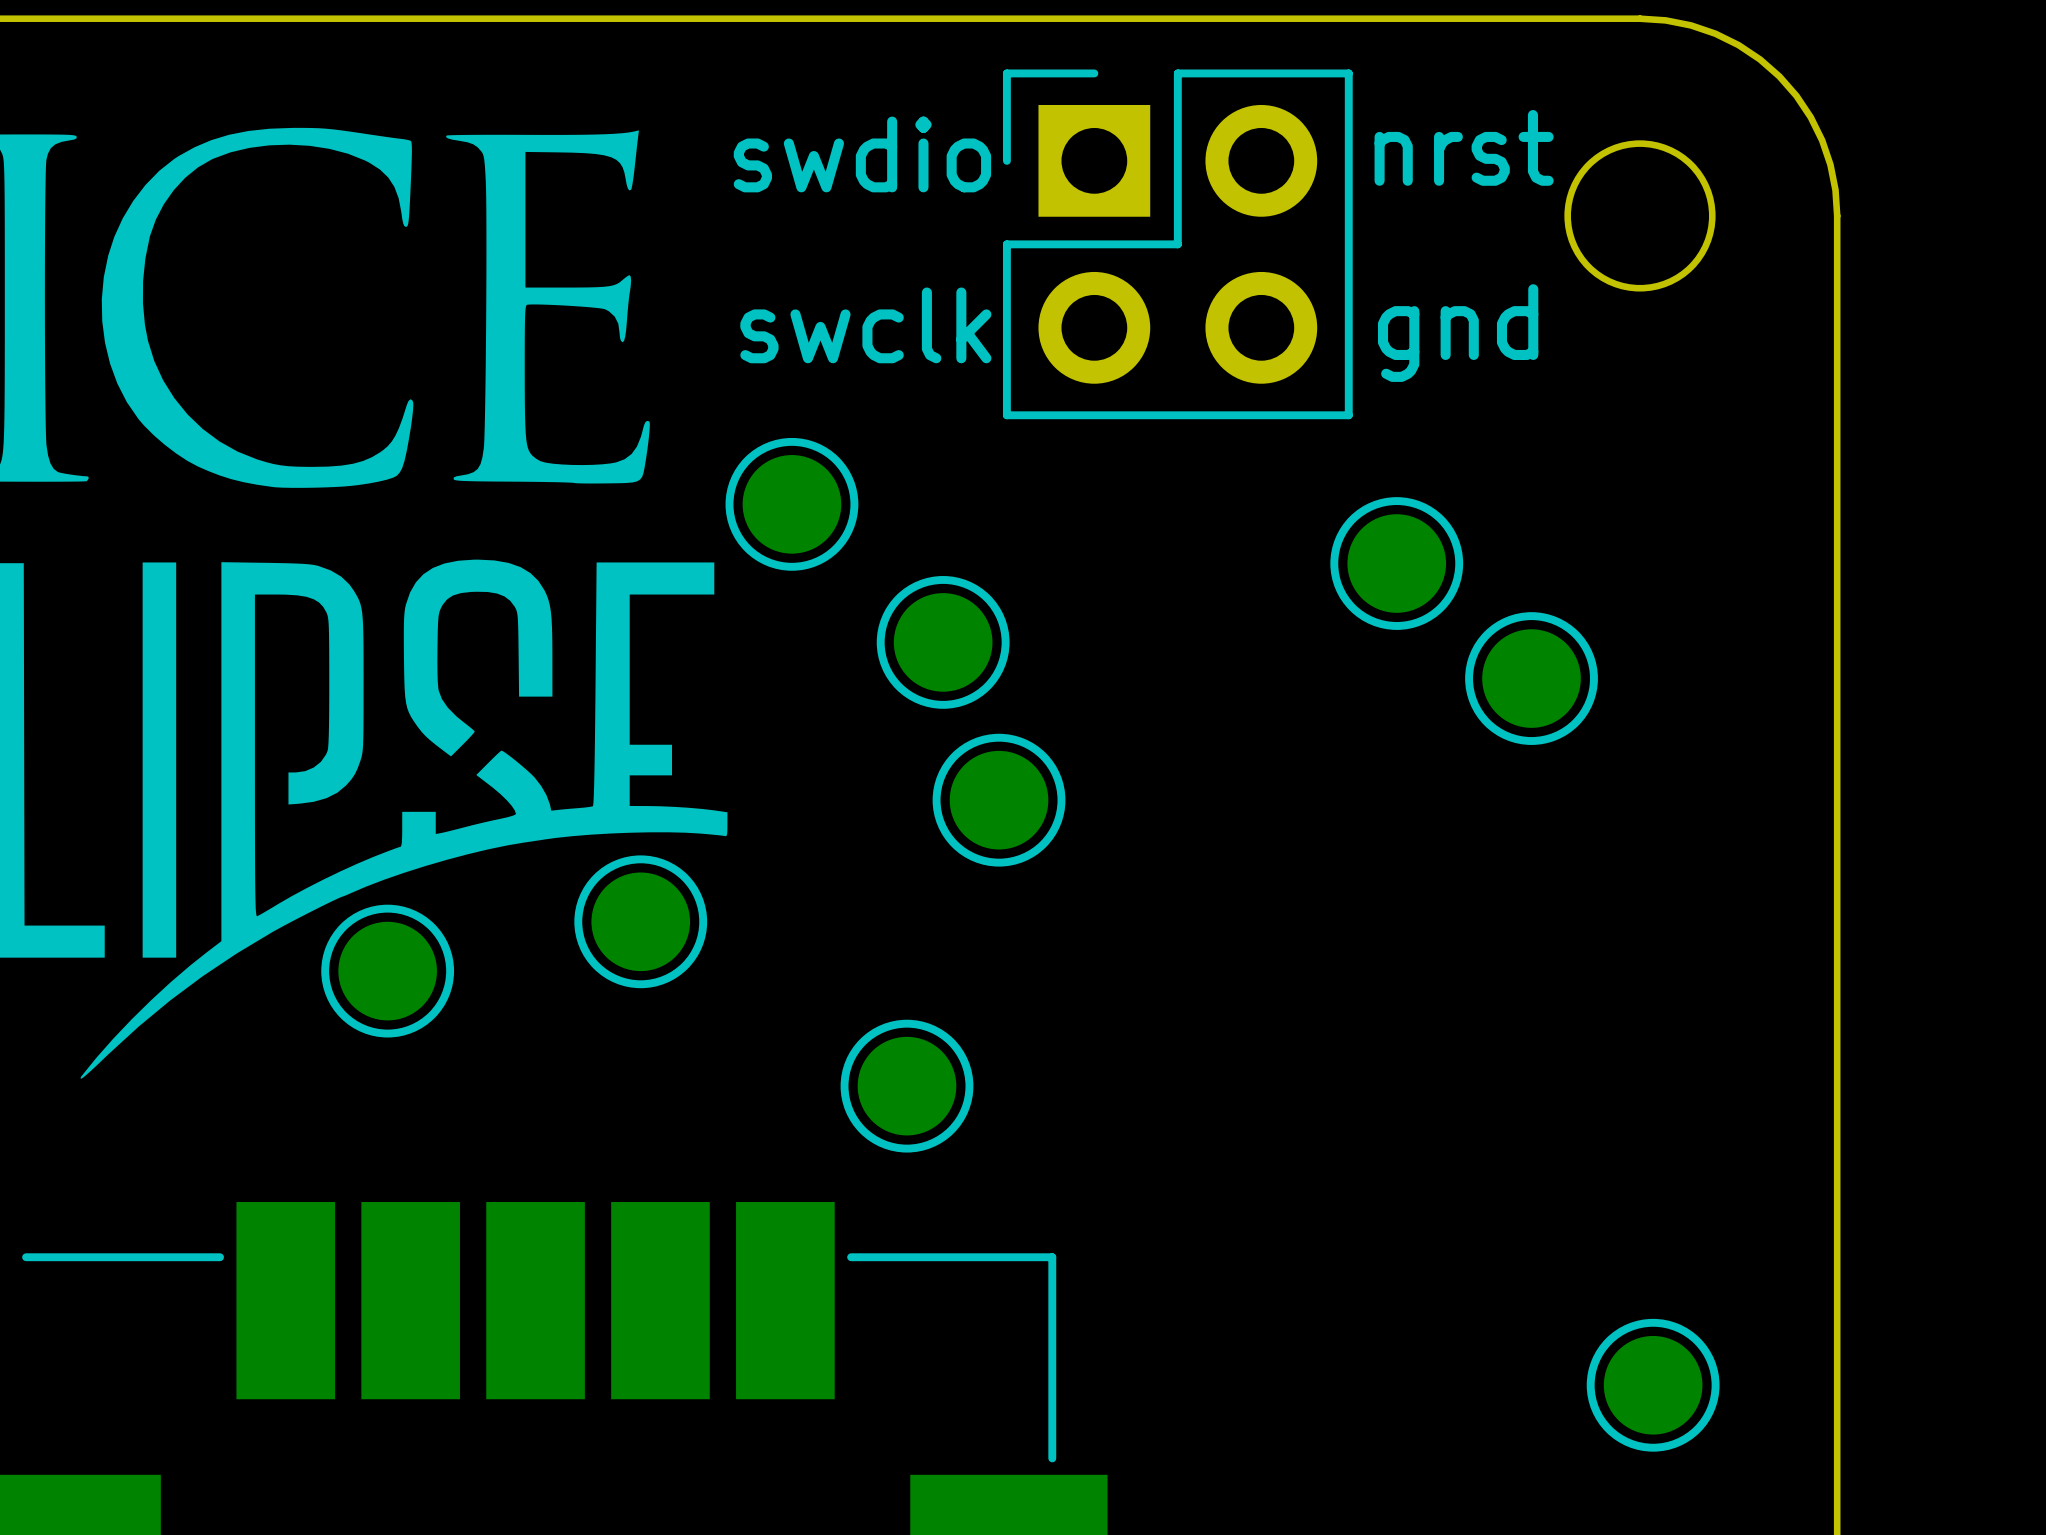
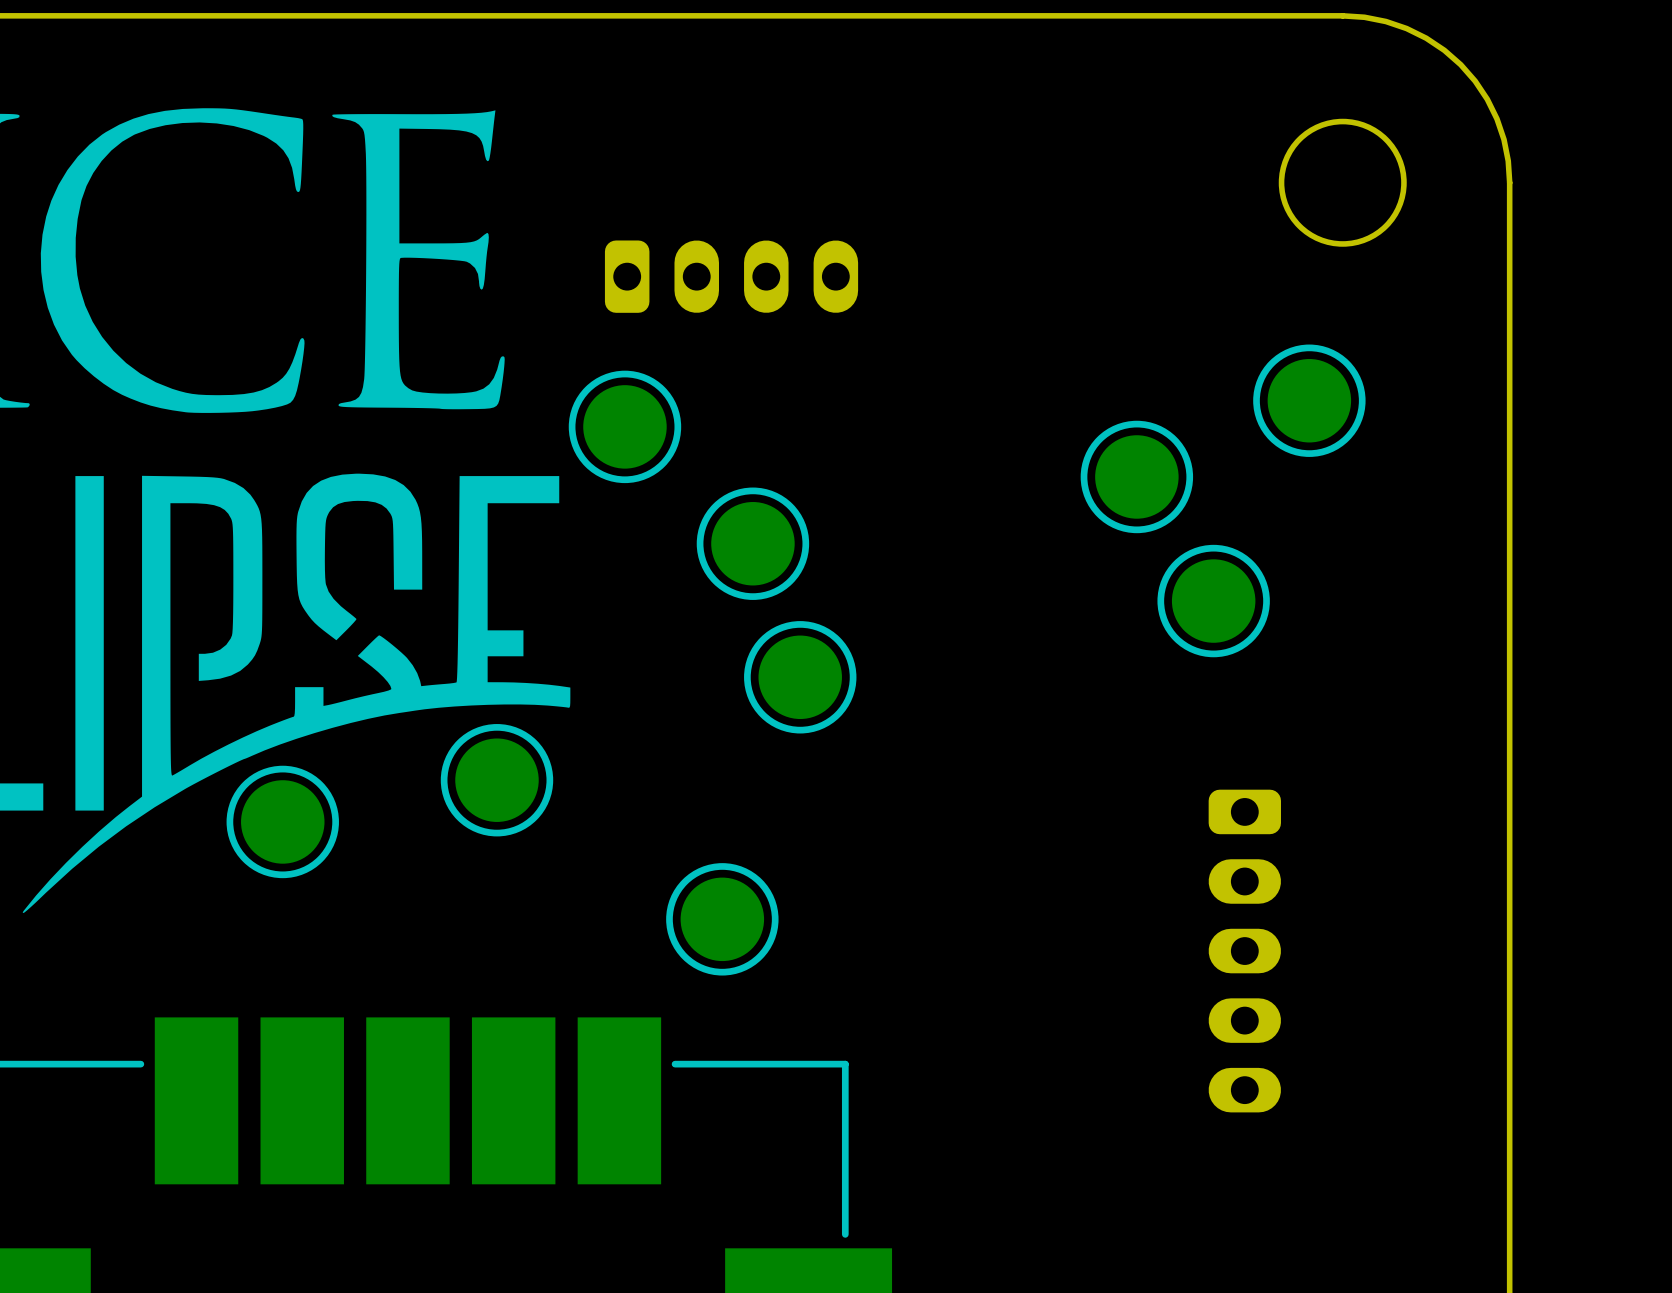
text: nrst (1464, 147) -> none
text: swdio (862, 154) -> none
part: (1177, 244) -> none
text: swclk (865, 325) -> none
part: none -> (731, 276)
text: gnd (1458, 333) -> none
part position: (1531, 678) -> (1213, 601)
part: none -> (1244, 951)
part position: (1653, 1385) -> (1309, 400)

